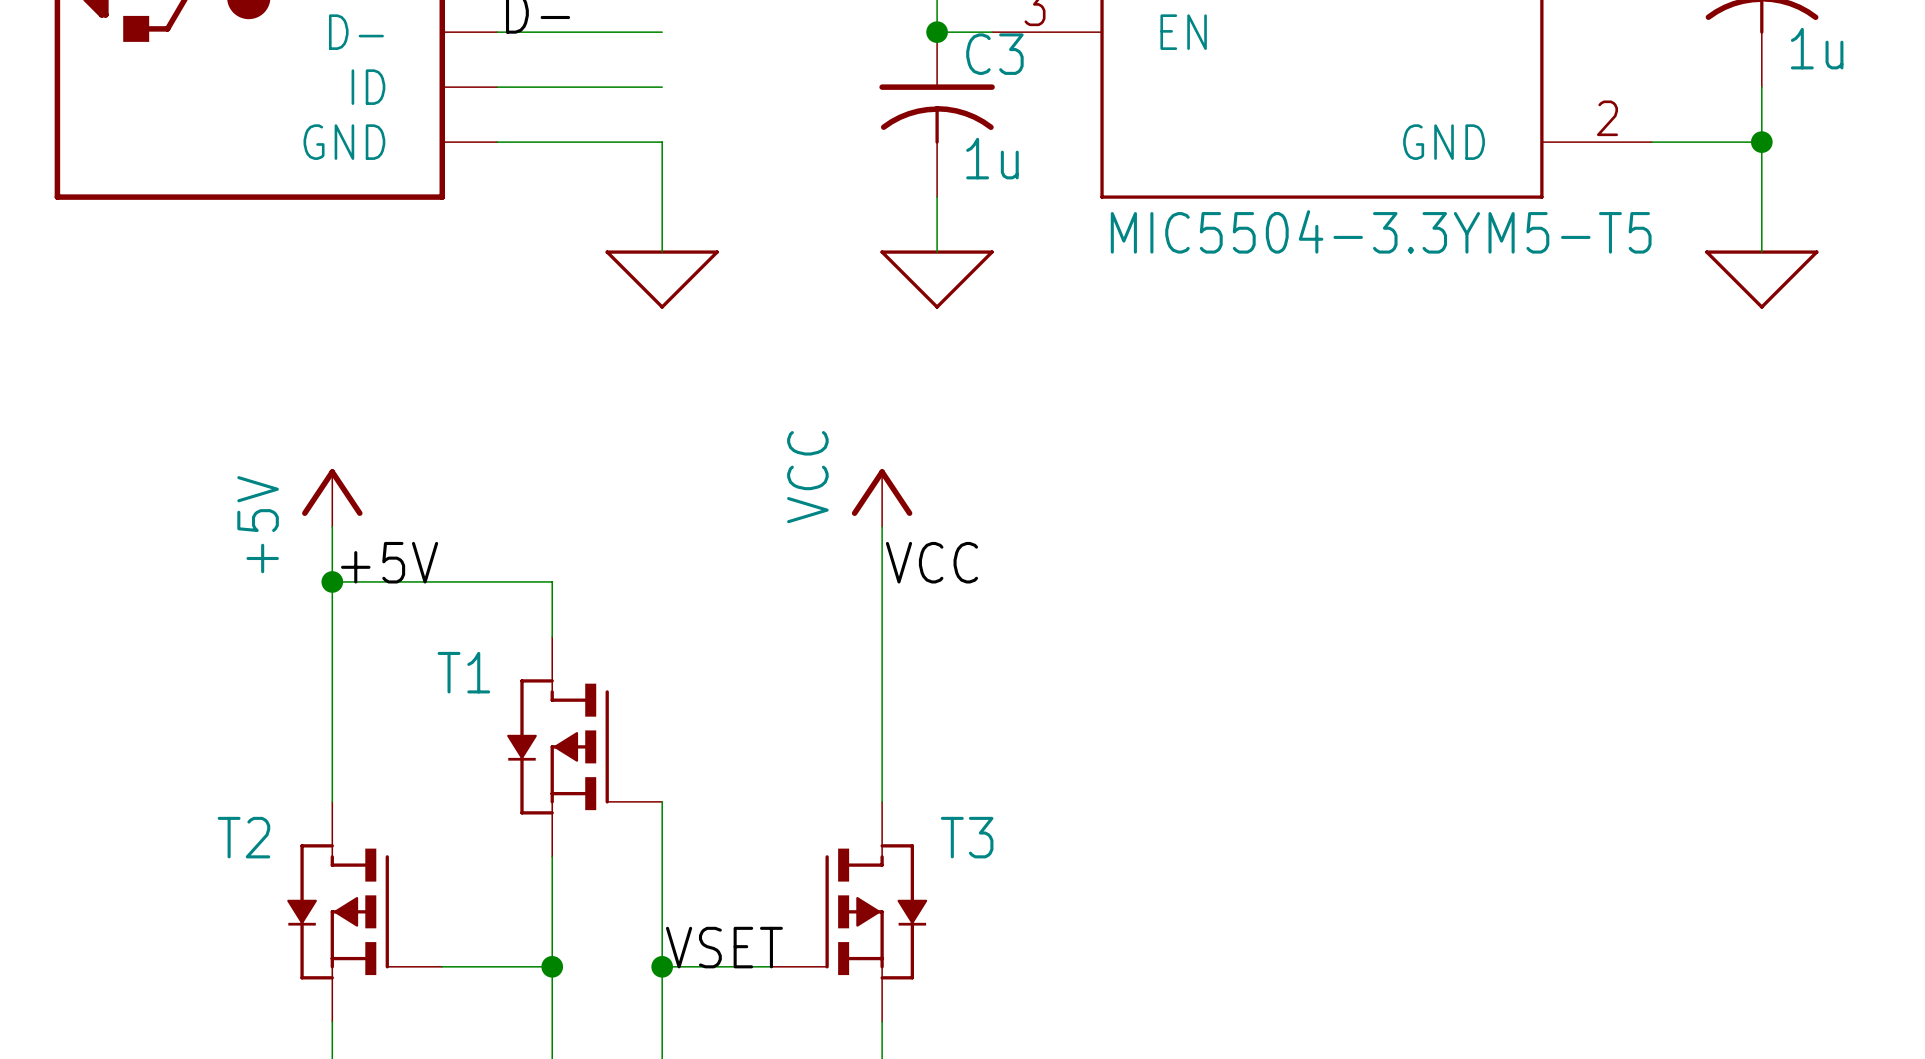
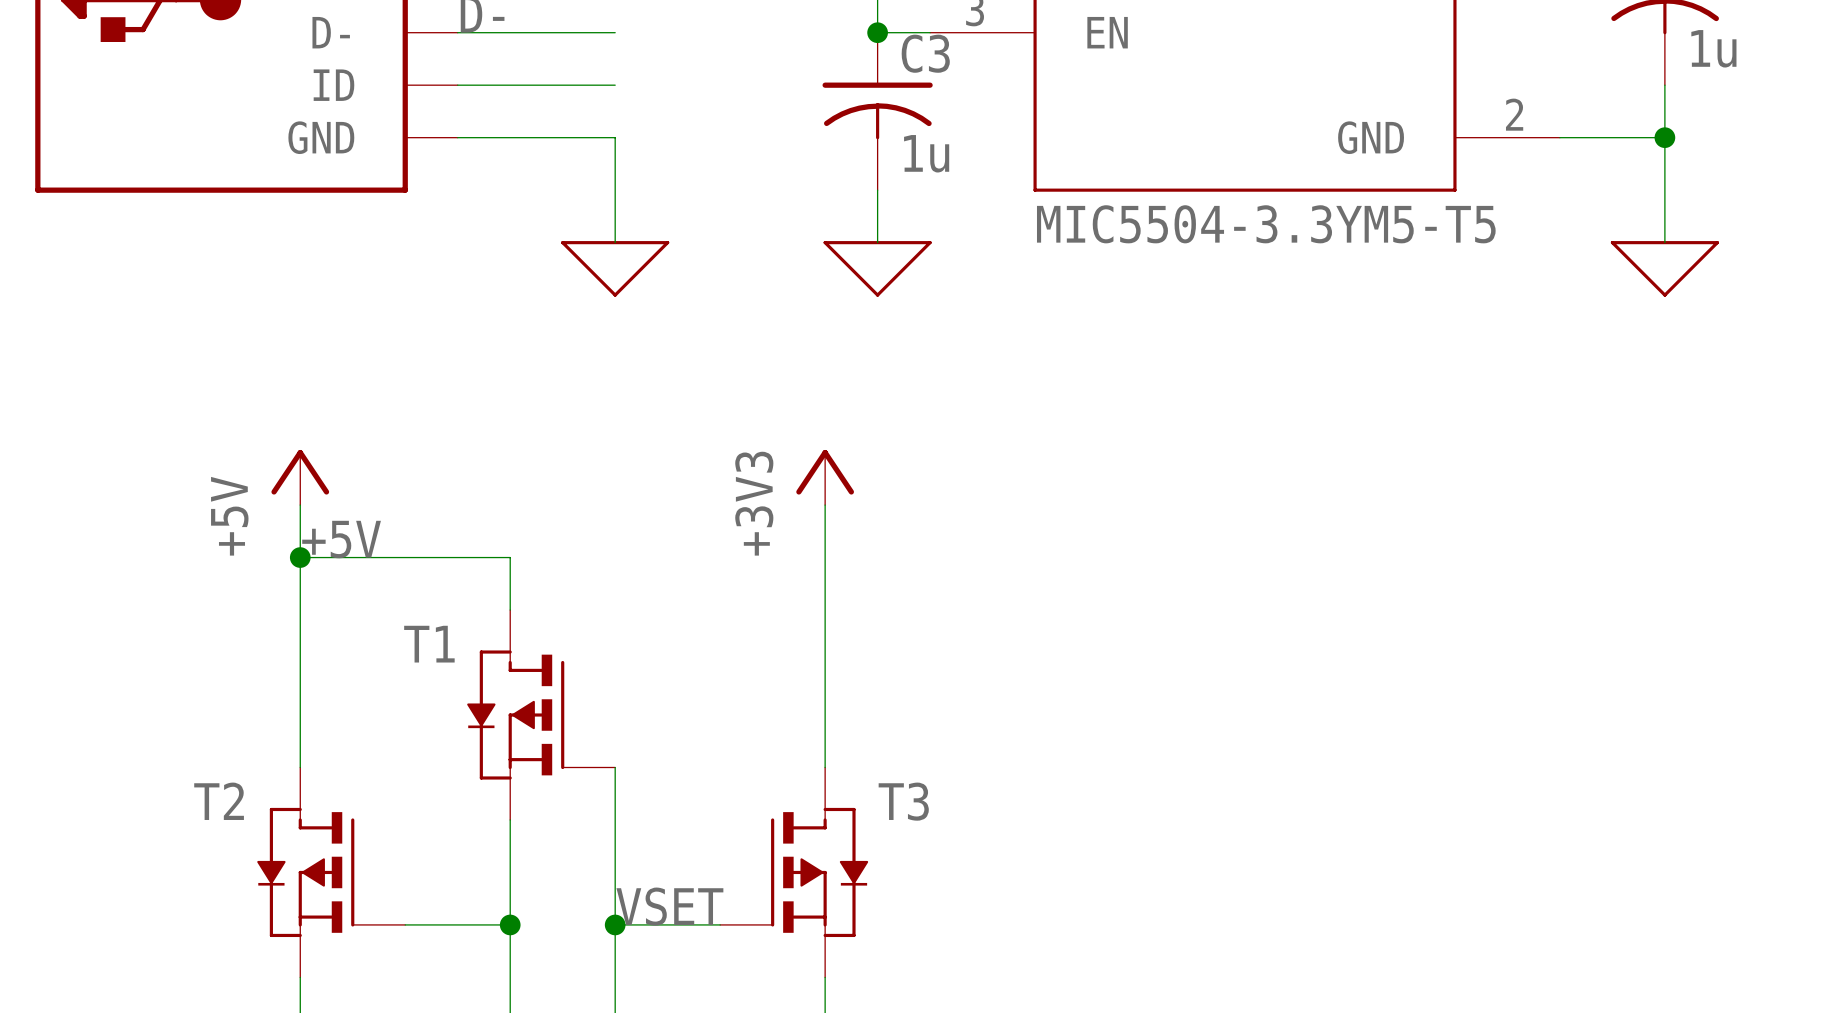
power symbol: VCC (882, 498) -> +3V3 (825, 477)
label: VCC (931, 562) -> none

